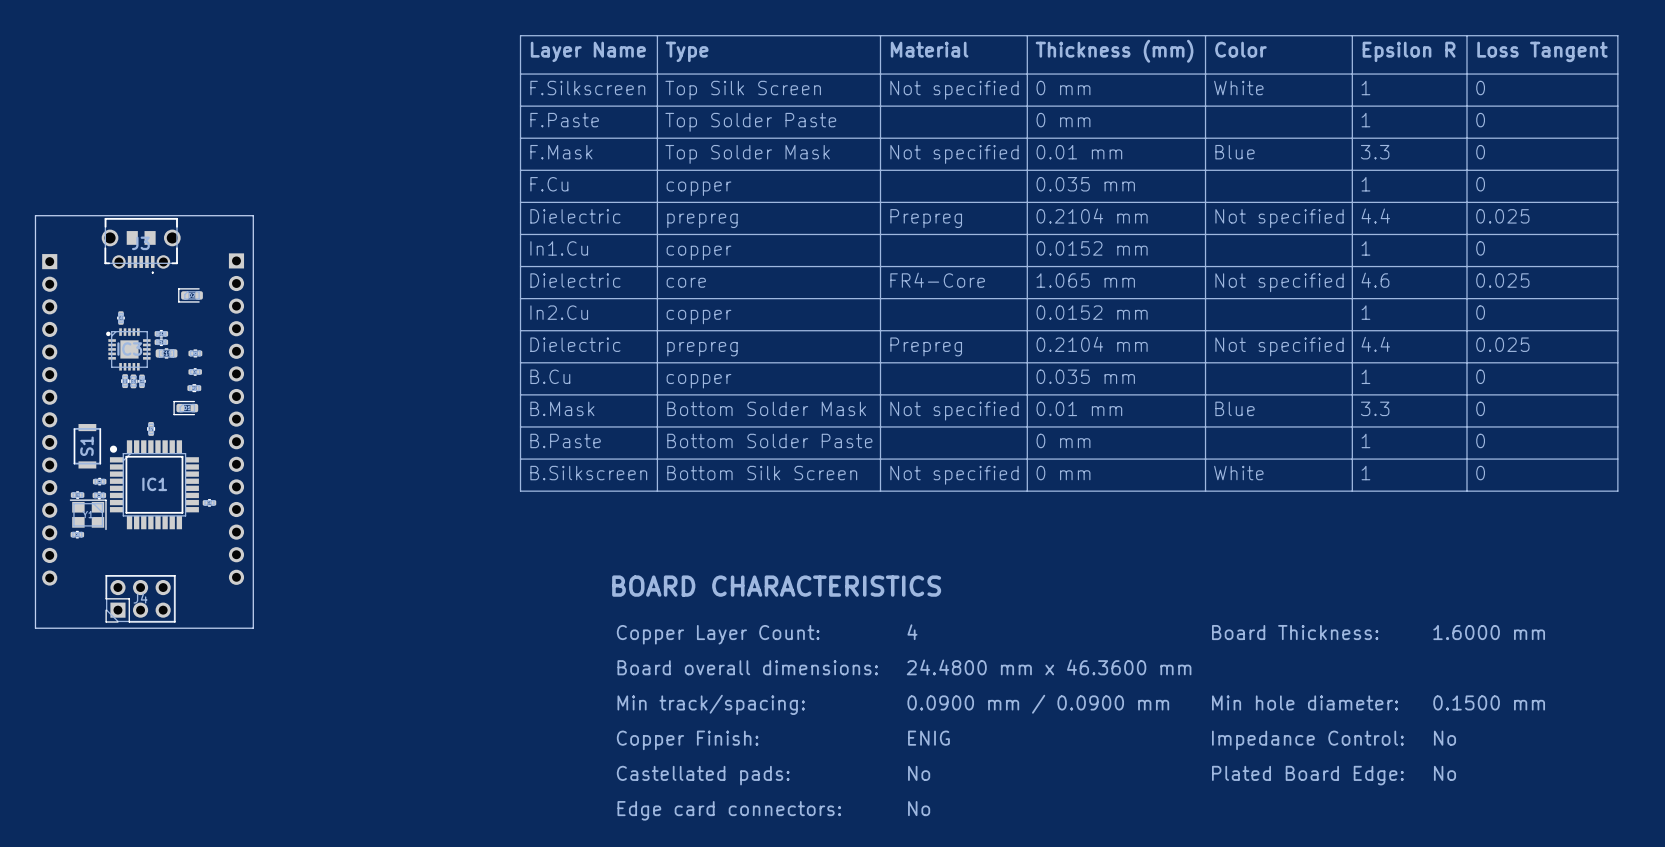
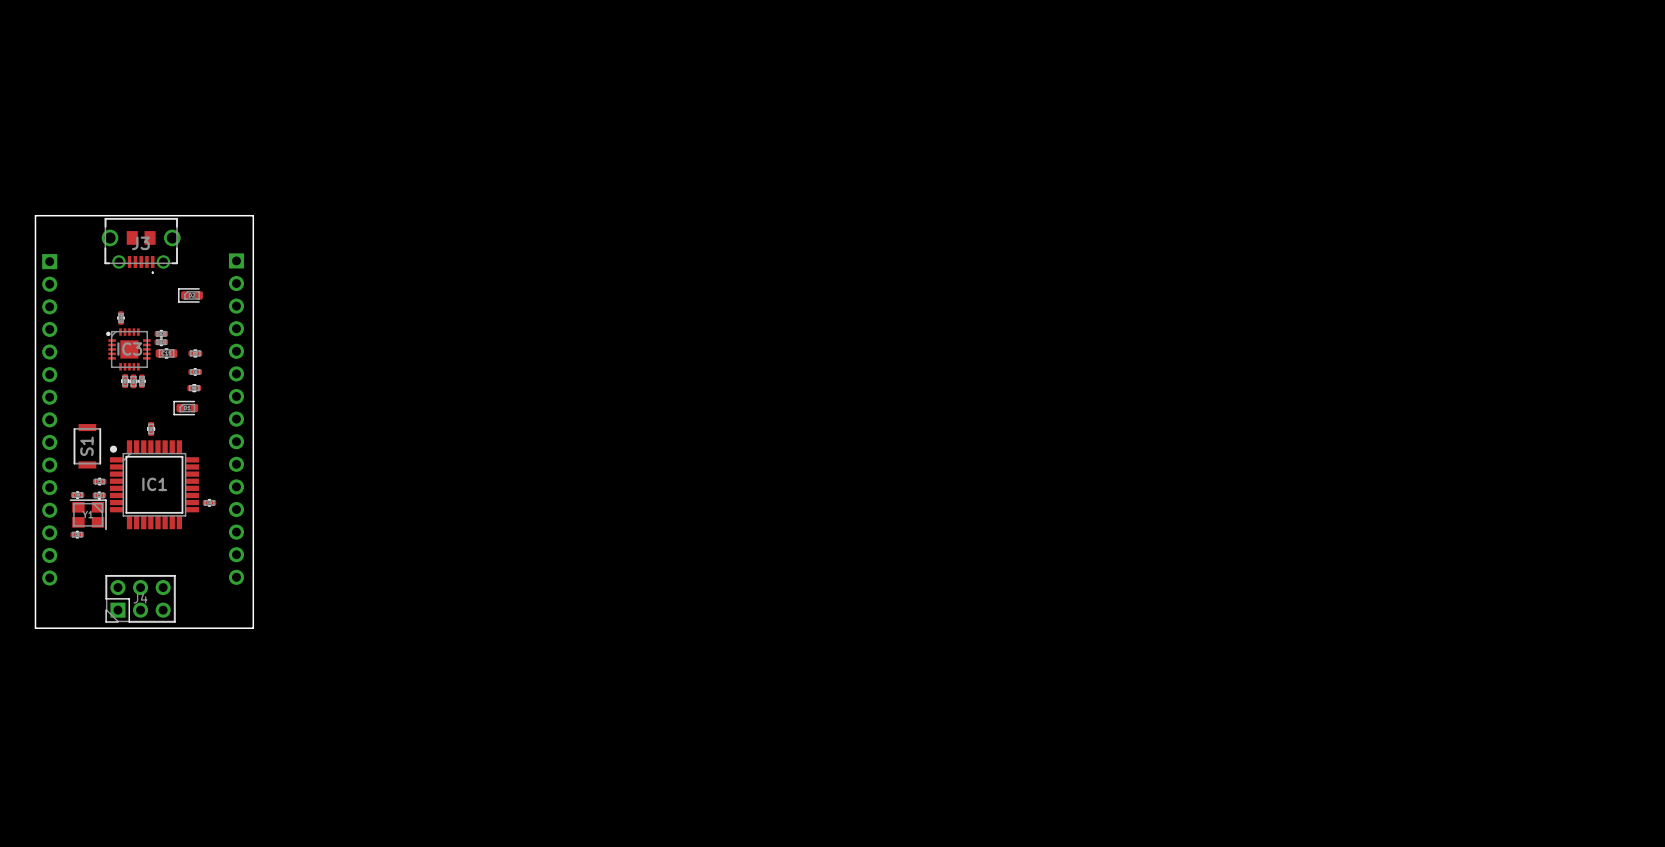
line: (520, 35) (520, 491) (1617, 491) (1617, 35) (520, 35) -> none
line: (657, 35) (657, 491) -> none
line: (880, 35) (880, 491) -> none
line: (1027, 35) (1027, 491) -> none
line: (1205, 35) (1205, 491) -> none
line: (1352, 35) (1352, 491) -> none
line: (1466, 35) (1466, 491) -> none
text: Material (929, 49) -> none
text: Color (1240, 49) -> none
text: Layer Name (588, 51) -> none
text: Type (687, 51) -> none
text: Thickness (mm) (1114, 51) -> none
text: Epsilon R (1409, 51) -> none
text: Loss Tangent (1542, 51) -> none
line: (520, 74) (1617, 74) -> none
text: F.Silkscreen (587, 88) -> none
text: 0 mm (1063, 88) -> none
text: White (1238, 88) -> none
text: 1 (1365, 88) -> none
text: 0 (1480, 88) -> none
text: Top Silk Screen (743, 90) -> none
text: Not specified (954, 90) -> none
line: (520, 106) (1617, 106) -> none
text: F.Paste (564, 120) -> none
text: 0 mm (1063, 120) -> none
text: 1 (1365, 120) -> none
text: 0 (1480, 120) -> none
text: Top Solder Paste (750, 122) -> none
line: (520, 138) (1617, 138) -> none
text: F.Mask (561, 152) -> none
text: 0.01 mm (1079, 152) -> none
text: Blue (1235, 152) -> none
text: 3.3 (1375, 152) -> none
text: 0 (1480, 152) -> none
text: Top Solder Mask (747, 154) -> none
text: Not specified (954, 154) -> none
line: (520, 170) (1617, 170) -> none
text: F.Cu (549, 184) -> none
text: 0.035 mm (1085, 184) -> none
text: 1 (1365, 184) -> none
text: 0 (1480, 184) -> none
text: copper (698, 188) -> none
line: (520, 202) (1617, 202) -> none
text: Dielectric (575, 216) -> none
text: 0.2104 mm (1092, 216) -> none
text: 4.4 (1375, 216) -> none
text: 0.025 (1502, 216) -> none
text: Prepreg (926, 218) -> none
text: Not specified (1279, 218) -> none
text: prepreg (702, 220) -> none
line: (520, 234) (1617, 234) -> none
text: In1.Cu (559, 248) -> none
text: 0.0152 mm (1092, 248) -> none
text: 1 (1365, 248) -> none
text: 0 (1480, 248) -> none
text: copper (698, 252) -> none
line: (520, 266) (1617, 266) -> none
text: Dielectric (575, 280) -> none
text: FR4-Core (937, 280) -> none
text: 1.065 mm (1085, 280) -> none
text: 4.6 (1375, 280) -> none
text: 0.025 (1502, 280) -> none
text: core (686, 282) -> none
text: Not specified (1279, 282) -> none
line: (520, 298) (1617, 298) -> none
text: In2.Cu (559, 312) -> none
text: 0.0152 mm (1092, 312) -> none
text: 1 (1365, 312) -> none
text: 0 (1480, 312) -> none
text: copper (698, 317) -> none
line: (520, 330) (1617, 330) -> none
text: Dielectric (575, 344) -> none
text: 0.2104 mm (1092, 344) -> none
text: 4.4 (1375, 344) -> none
text: 0.025 (1502, 344) -> none
text: Prepreg (926, 346) -> none
text: Not specified (1279, 346) -> none
text: prepreg (702, 349) -> none
line: (520, 362) (1617, 362) -> none
text: B.Cu (550, 376) -> none
text: 0.035 mm (1085, 376) -> none
text: 1 (1365, 376) -> none
text: 0 (1480, 376) -> none
text: copper (698, 381) -> none
line: (520, 394) (1617, 394) -> none
text: B.Mask (562, 408) -> none
text: Bottom Solder Mask (766, 408) -> none
text: 0.01 mm (1079, 408) -> none
text: Blue (1235, 408) -> none
text: 3.3 (1375, 408) -> none
text: 0 (1480, 408) -> none
text: Not specified (954, 411) -> none
line: (520, 426) (1617, 426) -> none
text: B.Paste (565, 440) -> none
text: Bottom Solder Paste (769, 440) -> none
text: 0 mm (1063, 440) -> none
text: 1 (1365, 440) -> none
text: 0 (1480, 440) -> none
line: (520, 459) (1617, 459) -> none
text: B.Silkscreen (588, 473) -> none
text: Bottom Silk Screen (762, 473) -> none
text: 0 mm (1063, 473) -> none
text: White (1238, 473) -> none
text: 1 (1365, 473) -> none
text: 0 (1480, 473) -> none
text: Not specified (954, 475) -> none
text: BOARD CHARACTERISTICS (776, 586) -> none
text: 4 (912, 632) -> none
text: Board Thickness: (1295, 632) -> none
text: 1.6000 mm (1489, 632) -> none
text: Copper Layer Count: (718, 634) -> none
text: Board overall dimensions: (747, 667) -> none
text: 24.4800 mm x 46.3600 mm (1049, 667) -> none
text: Min hole diameter: (1305, 702) -> none
text: 0.1500 mm (1489, 702) -> none
text: Min track/spacing: (711, 704) -> none
text: 0.0900 mm / 0.0900 mm (1038, 704) -> none
text: ENIG (928, 738) -> none
text: No (1444, 738) -> none
text: Copper Finish: (687, 740) -> none
text: Impedance Control: (1307, 740) -> none
text: No (919, 773) -> none
text: No (1444, 773) -> none
text: Castellated pads: (703, 775) -> none
text: Plated Board Edge: (1307, 775) -> none
text: No (919, 808) -> none
text: Edge card connectors: (729, 810) -> none

